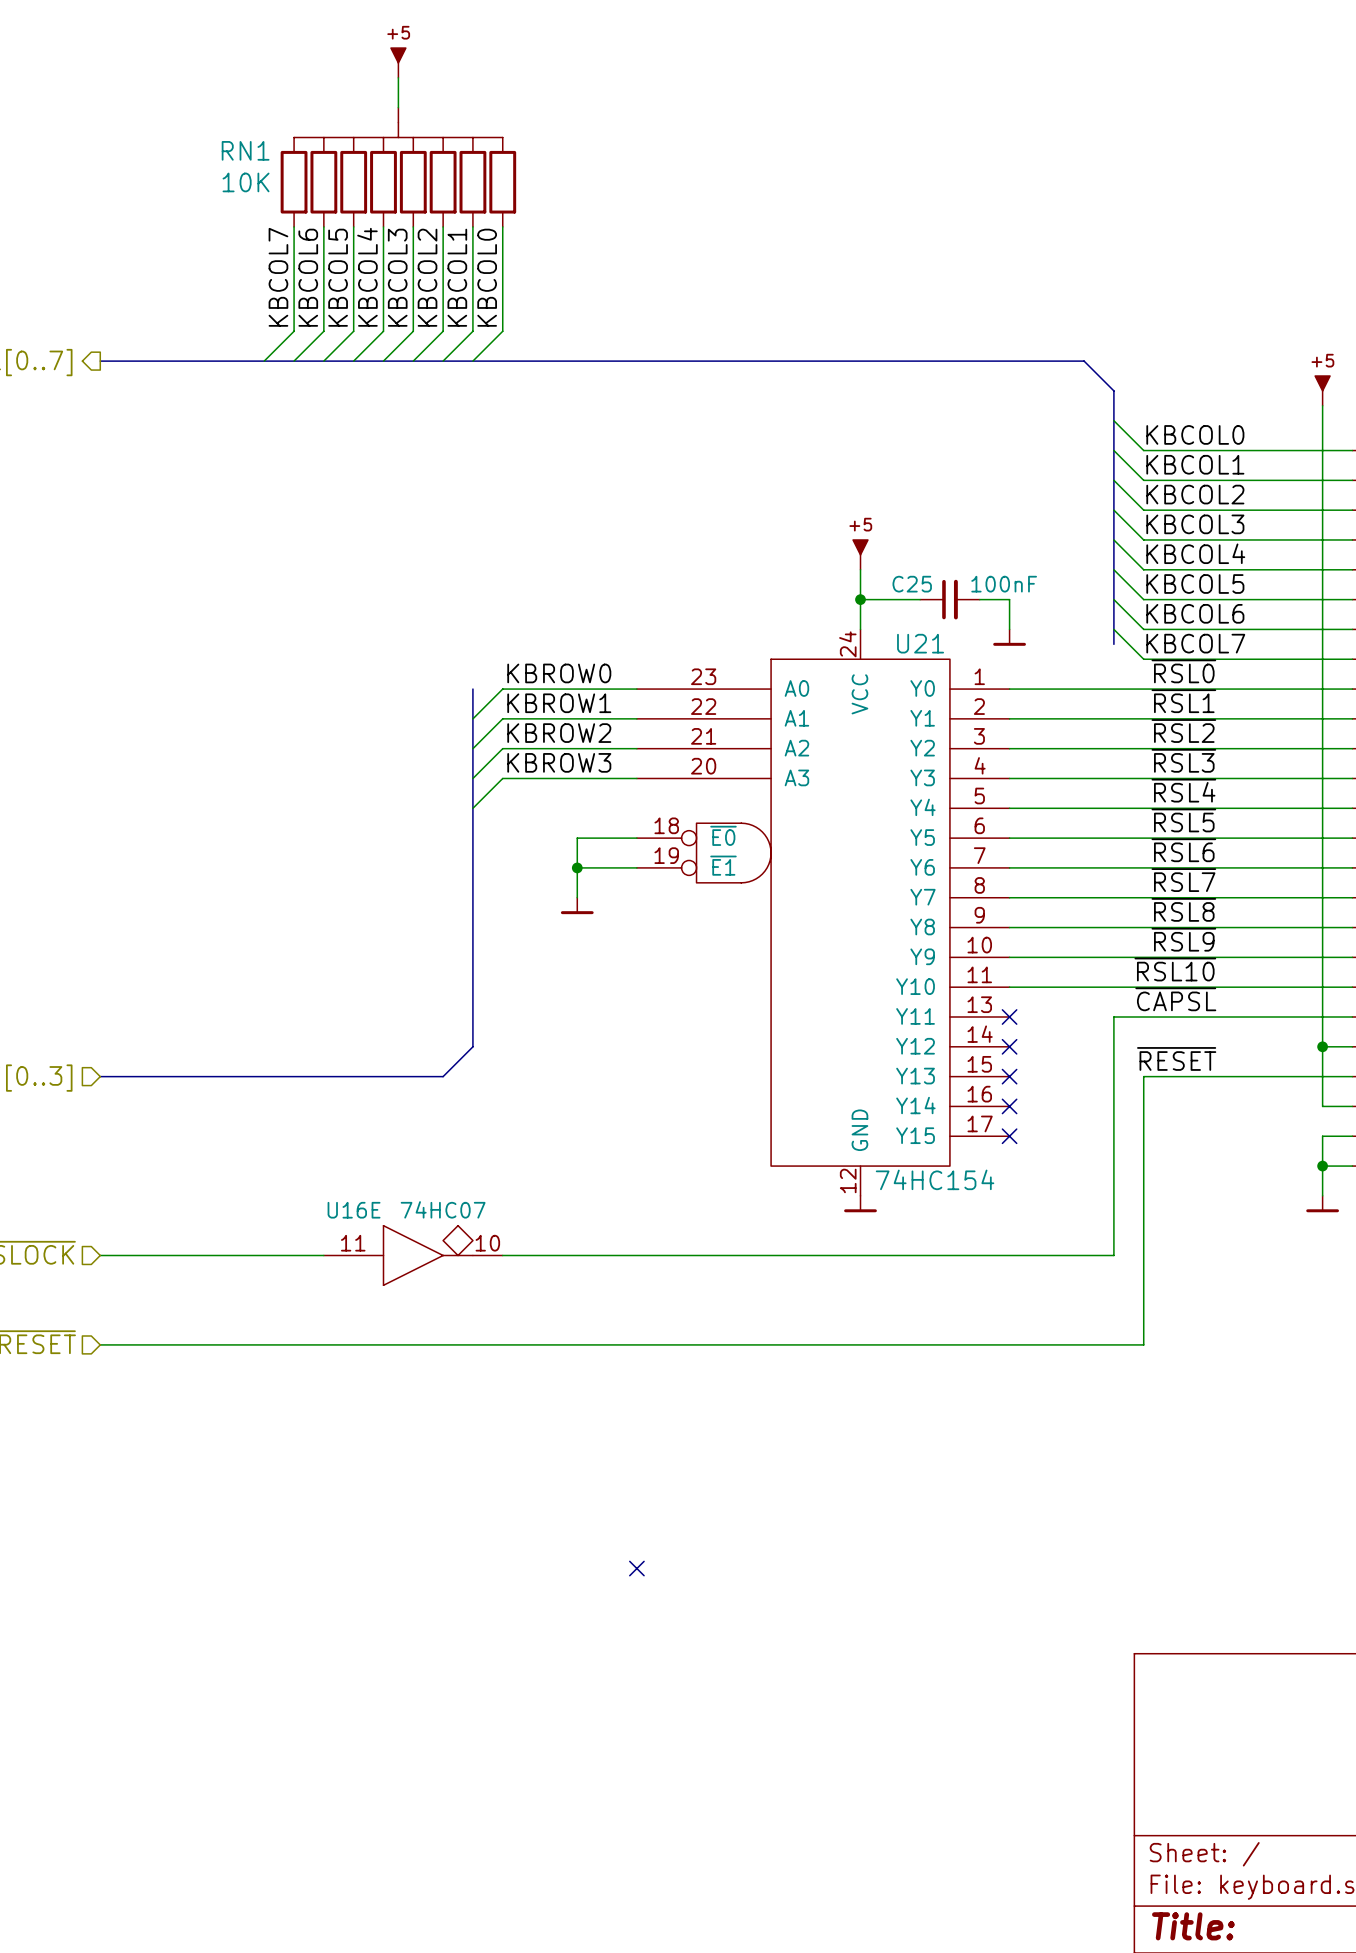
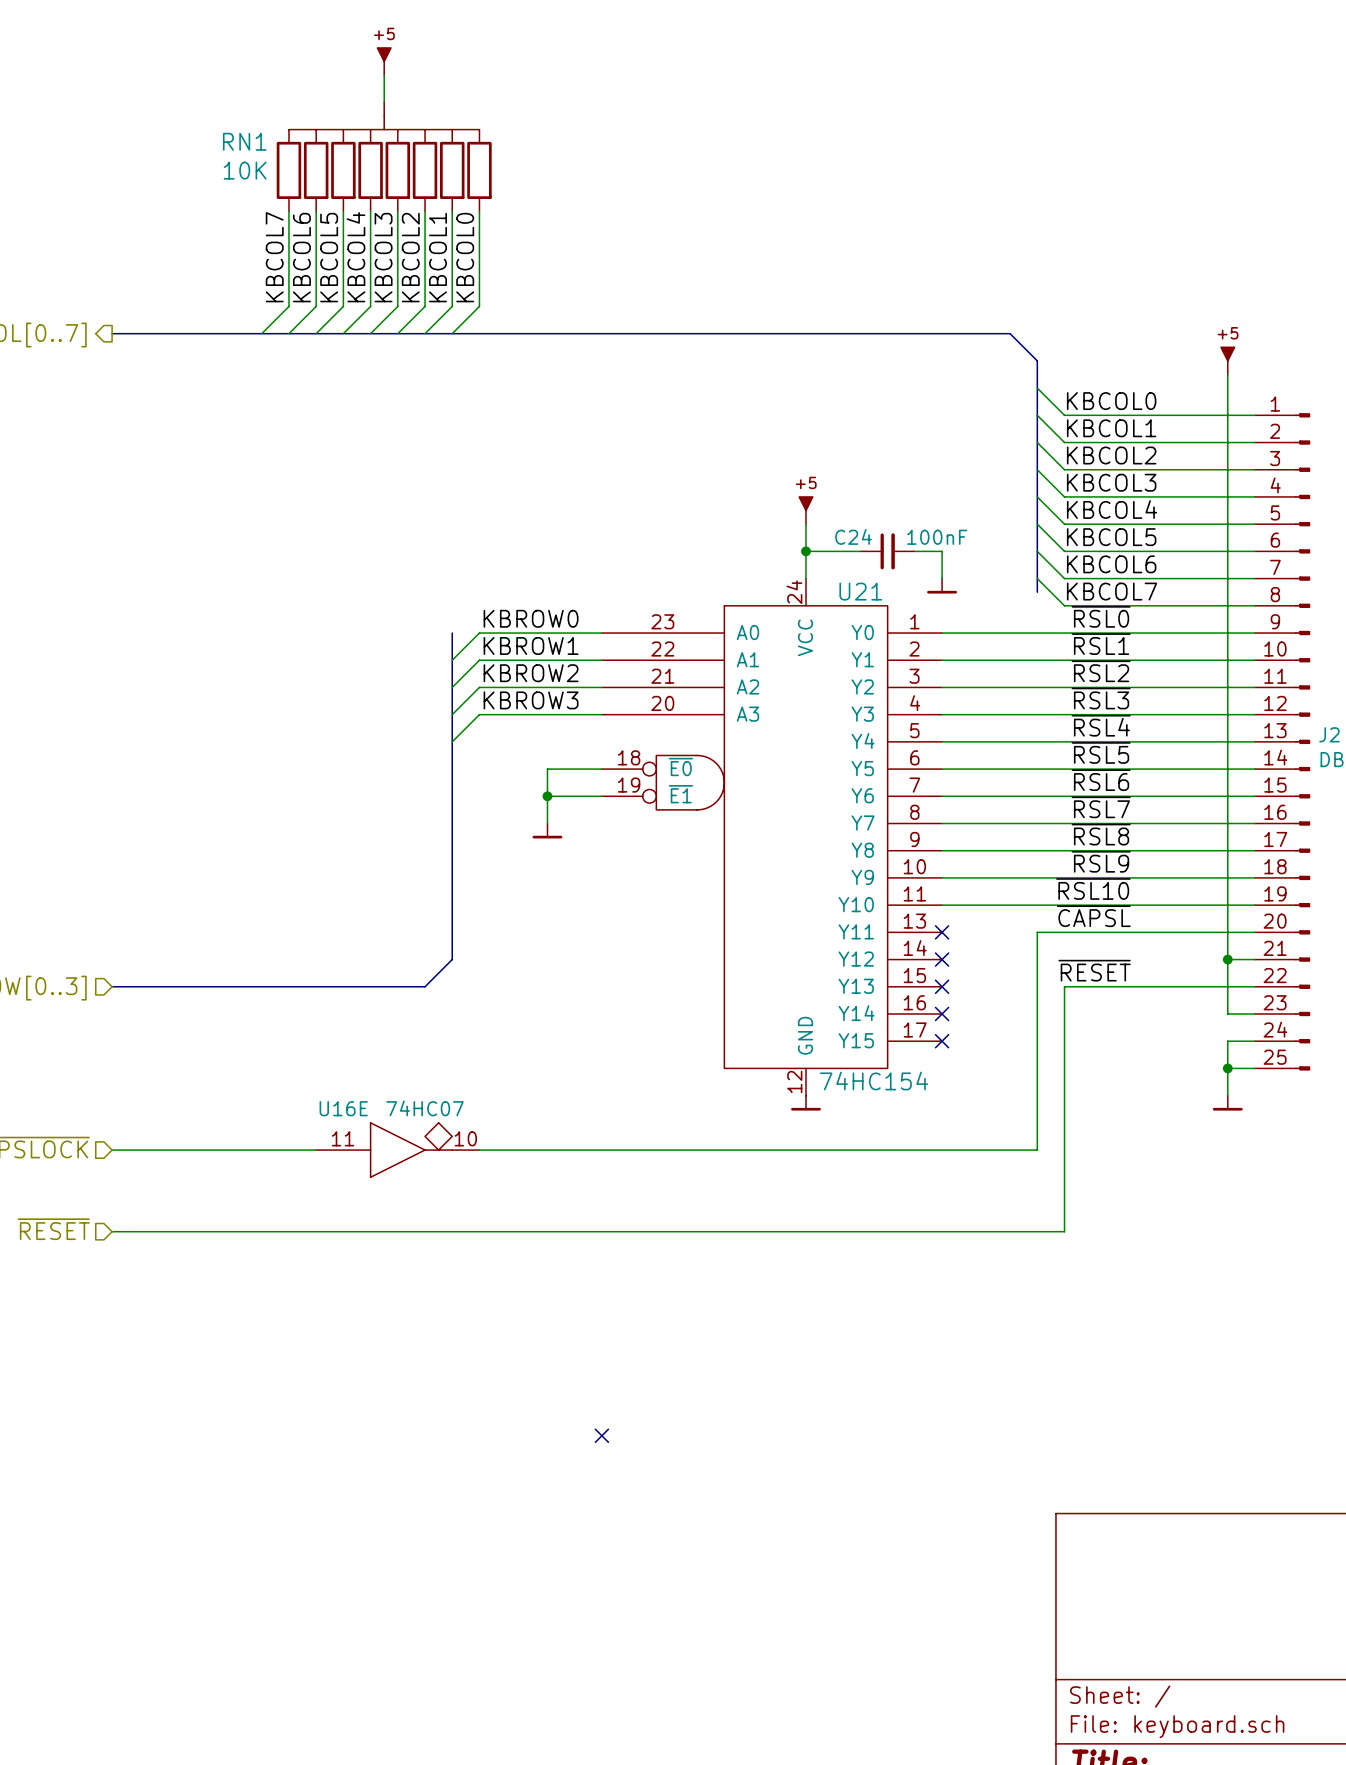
C25 name: C25 (912, 584) -> C24 (853, 536)

